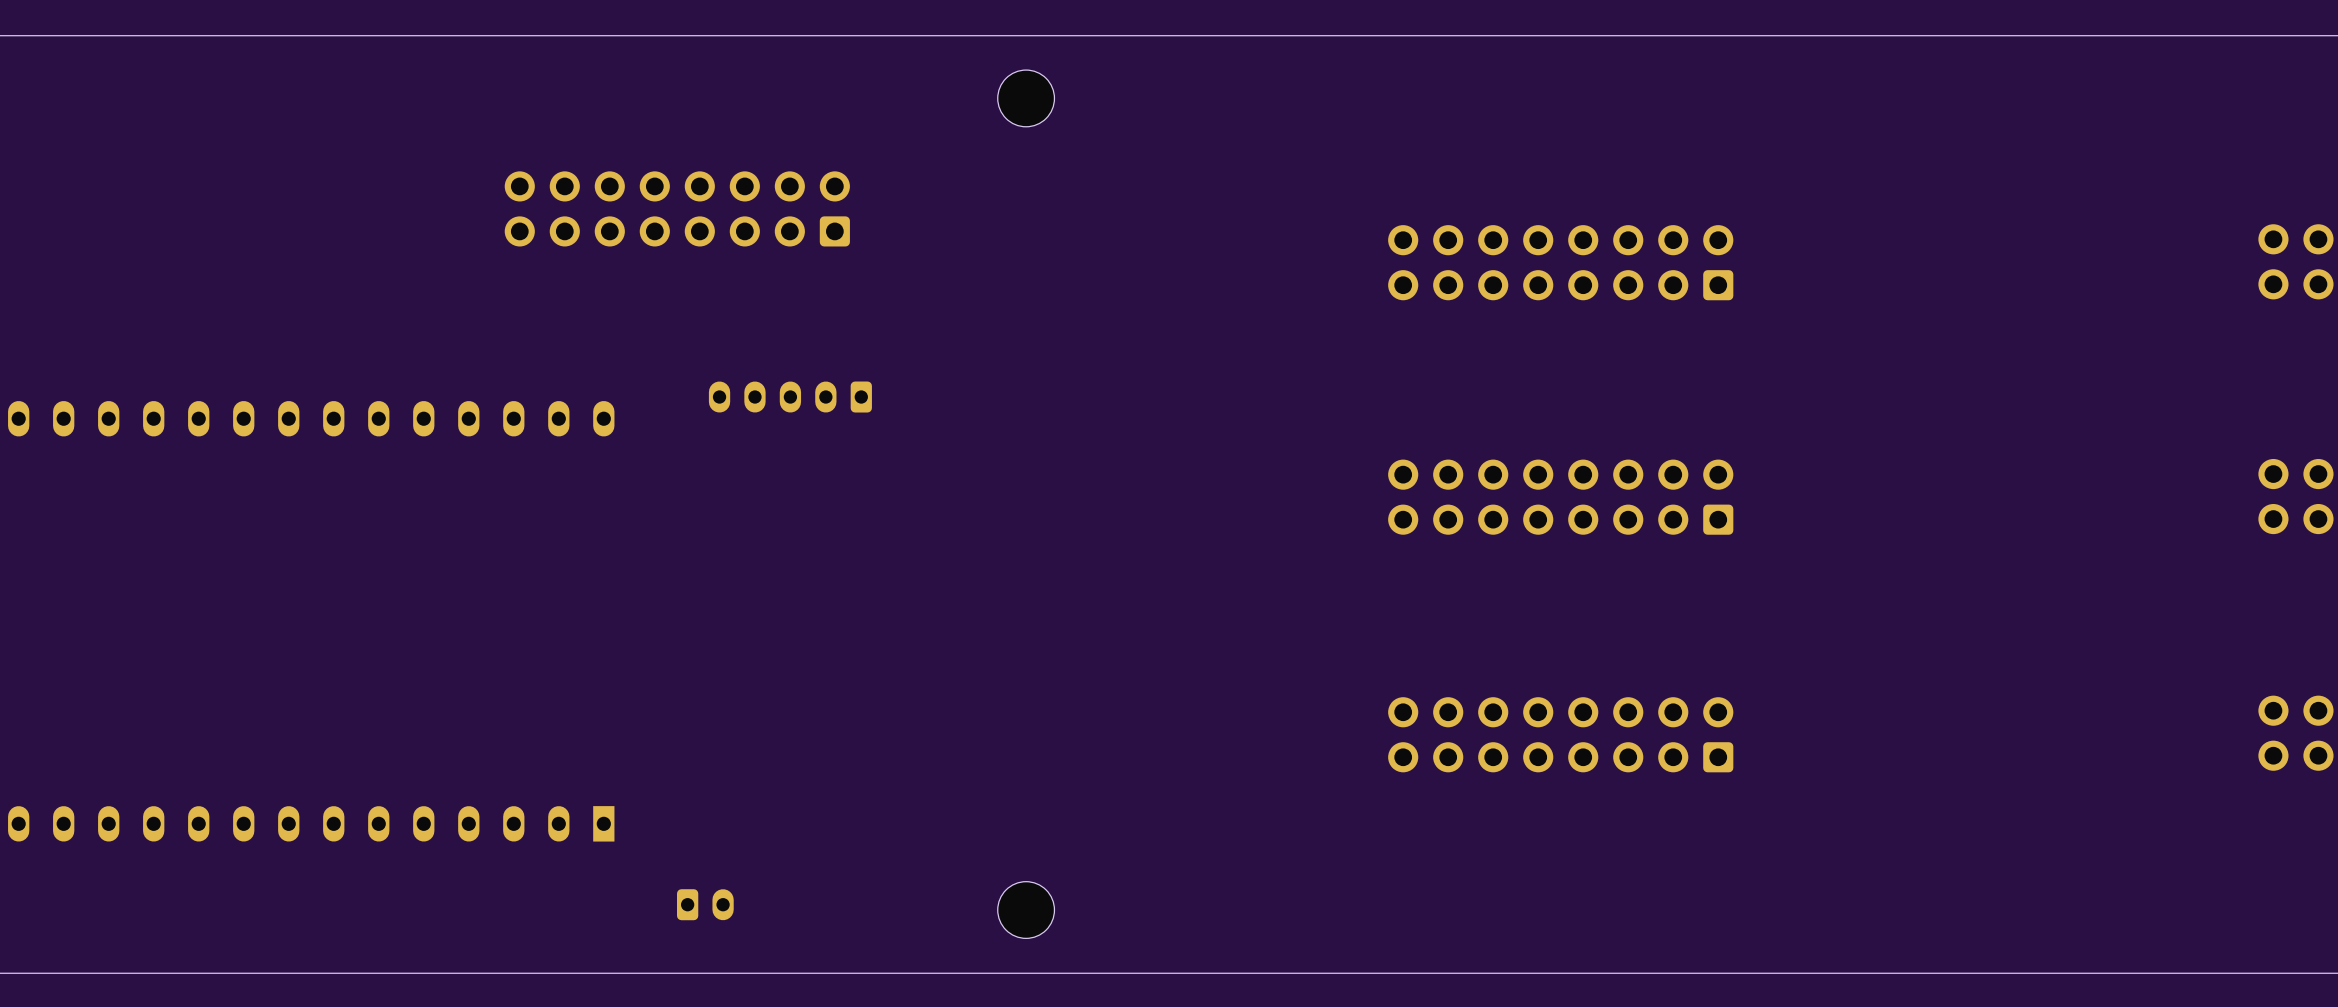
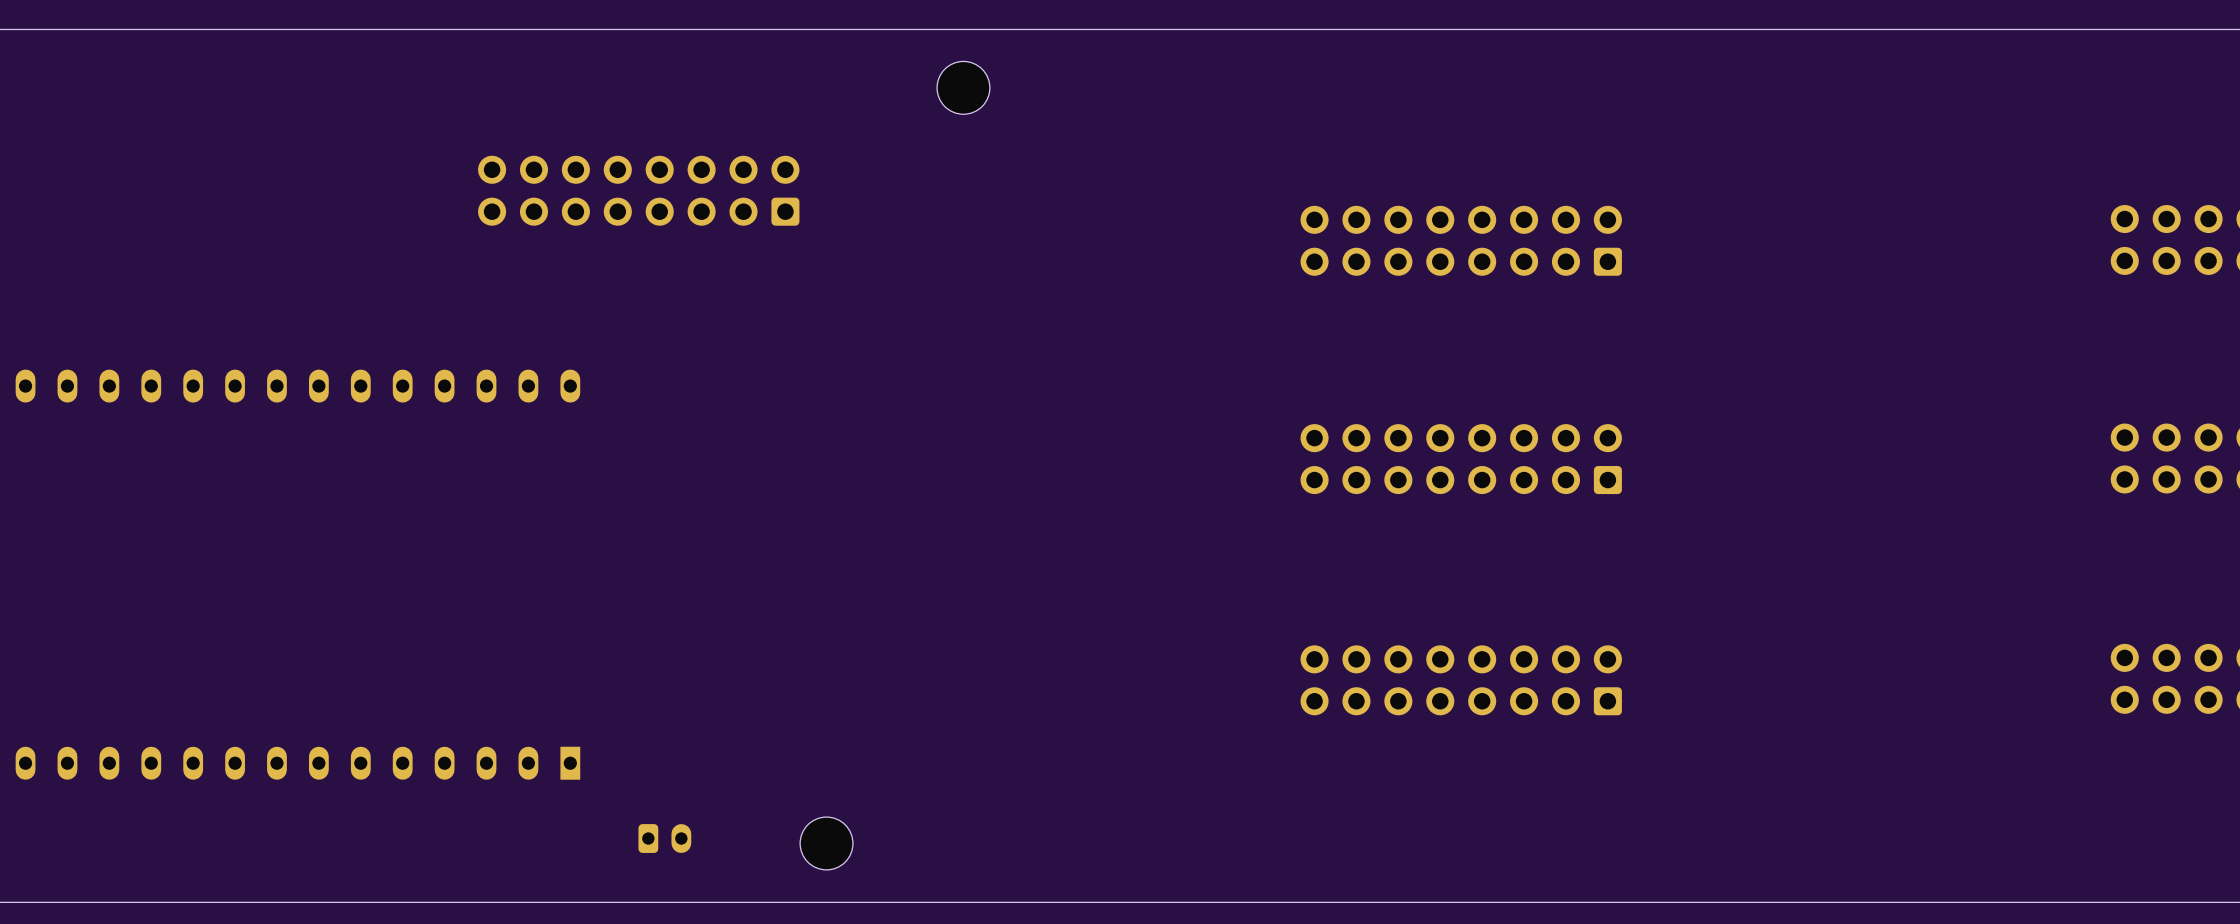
part: (790, 397) -> none
part position: (1026, 910) -> (826, 843)

